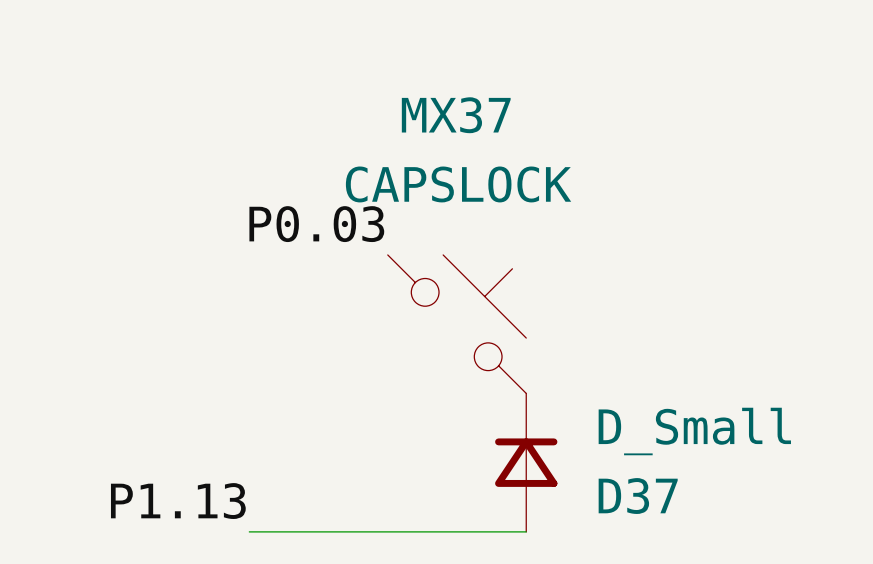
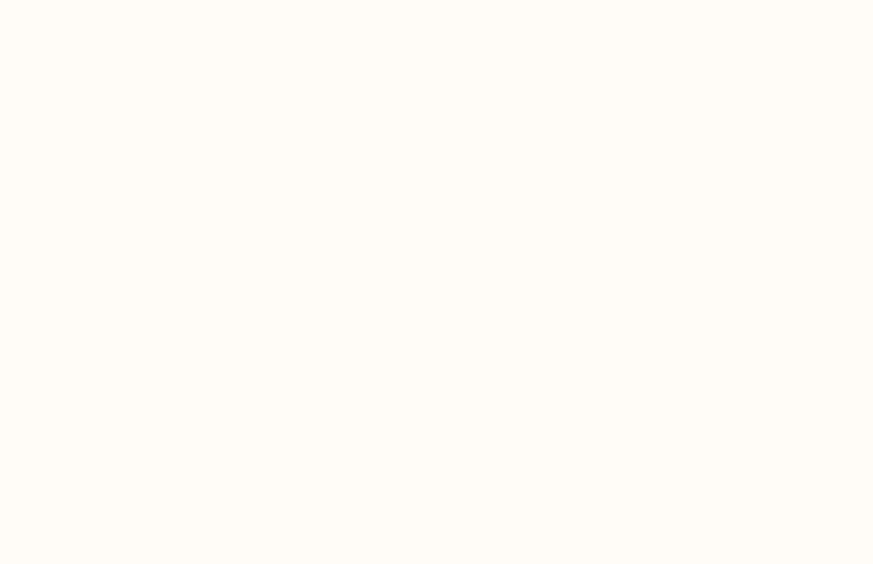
label: P0.03 (316, 224) -> none
MX37: CAPSLOCK (457, 324) -> none
D37: D_Small (526, 462) -> none
label: P1.13 (178, 501) -> none
wire: (249, 531) (526, 531) -> none

